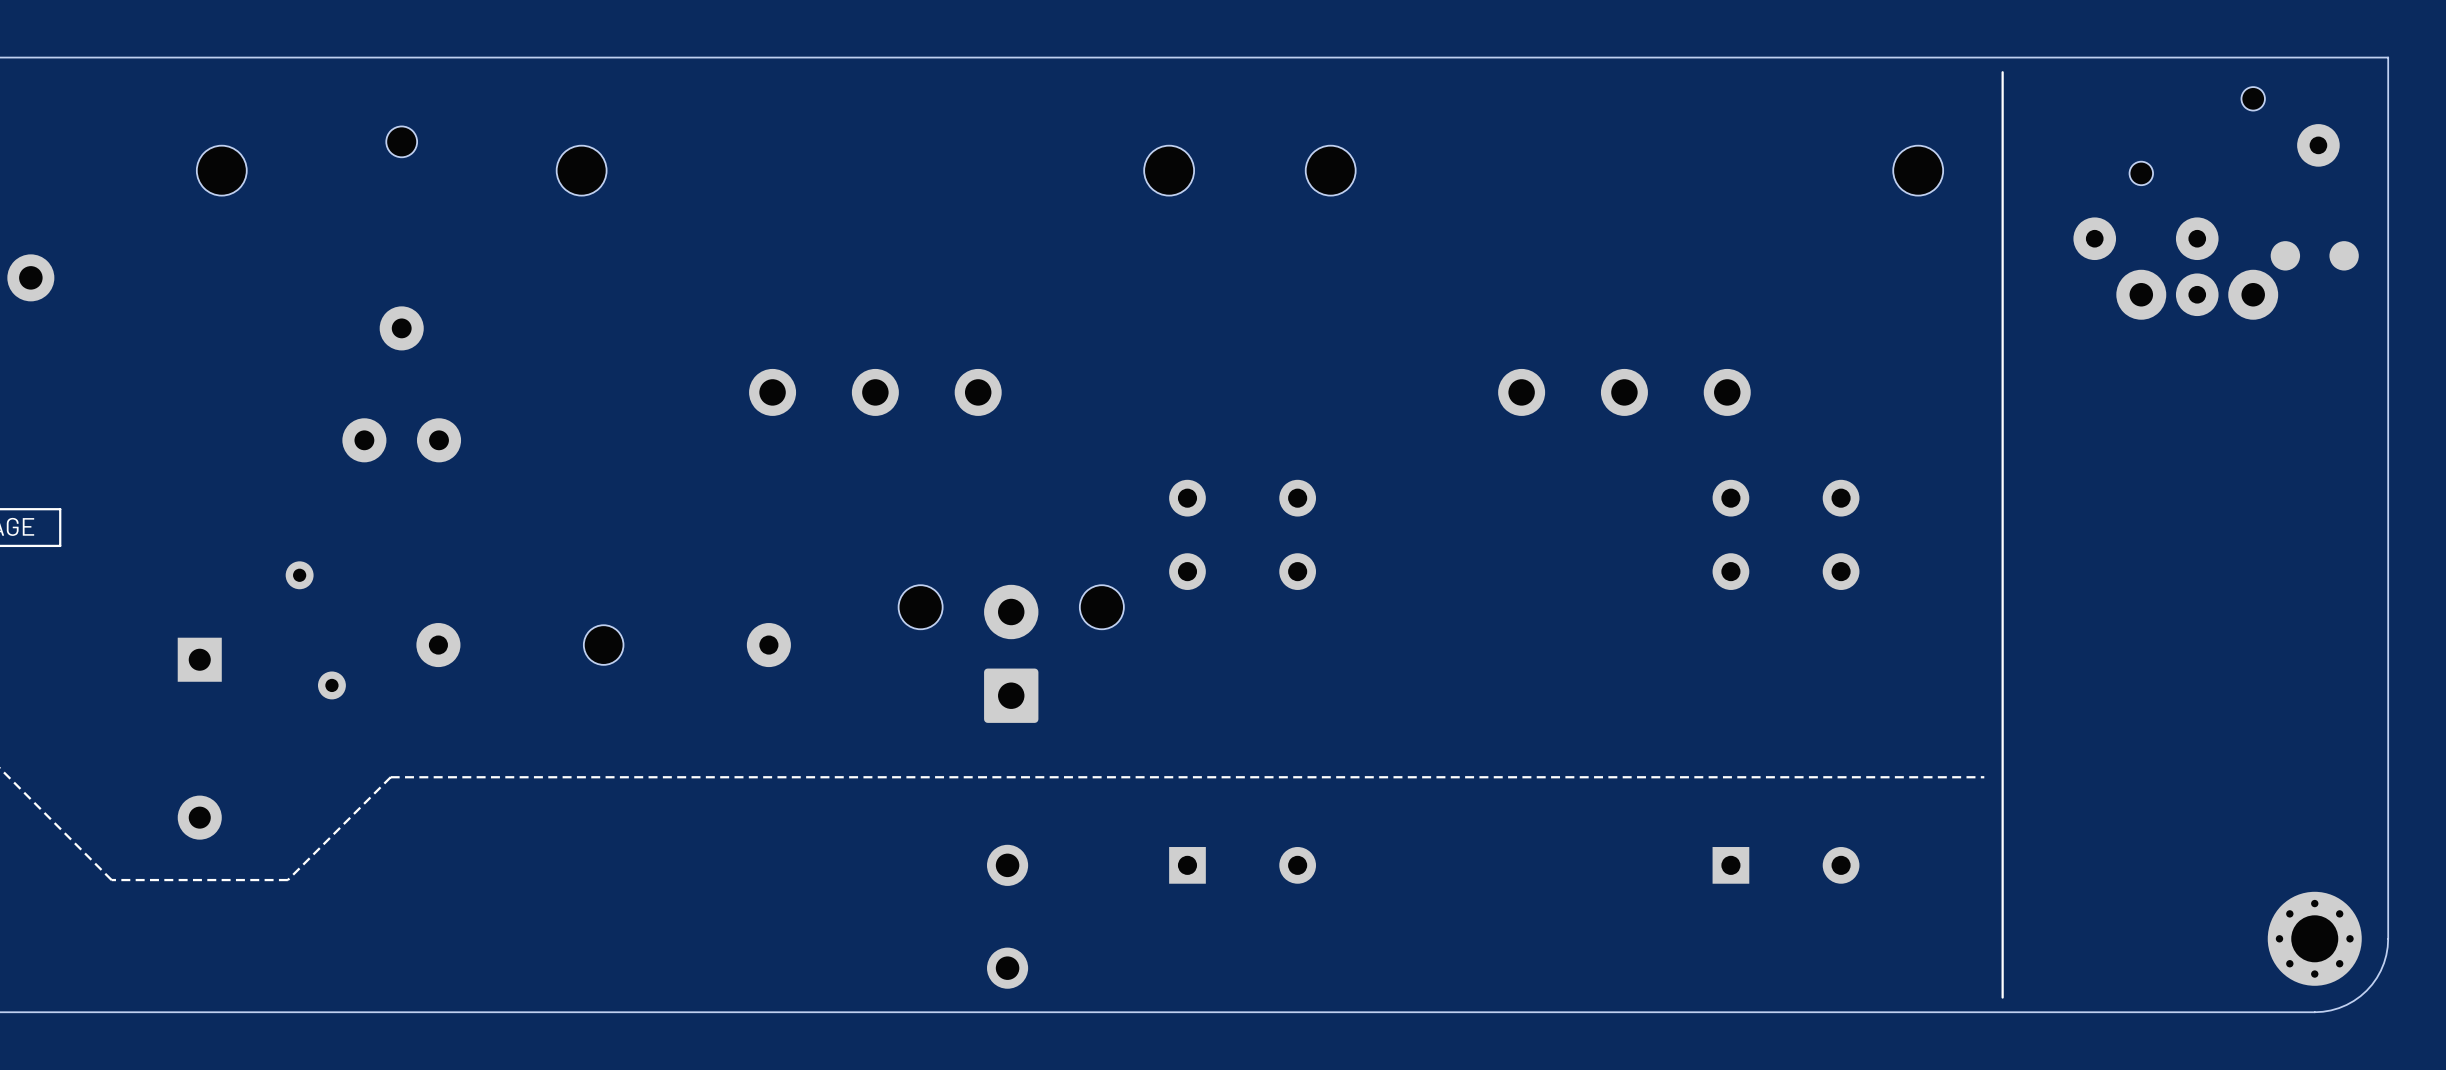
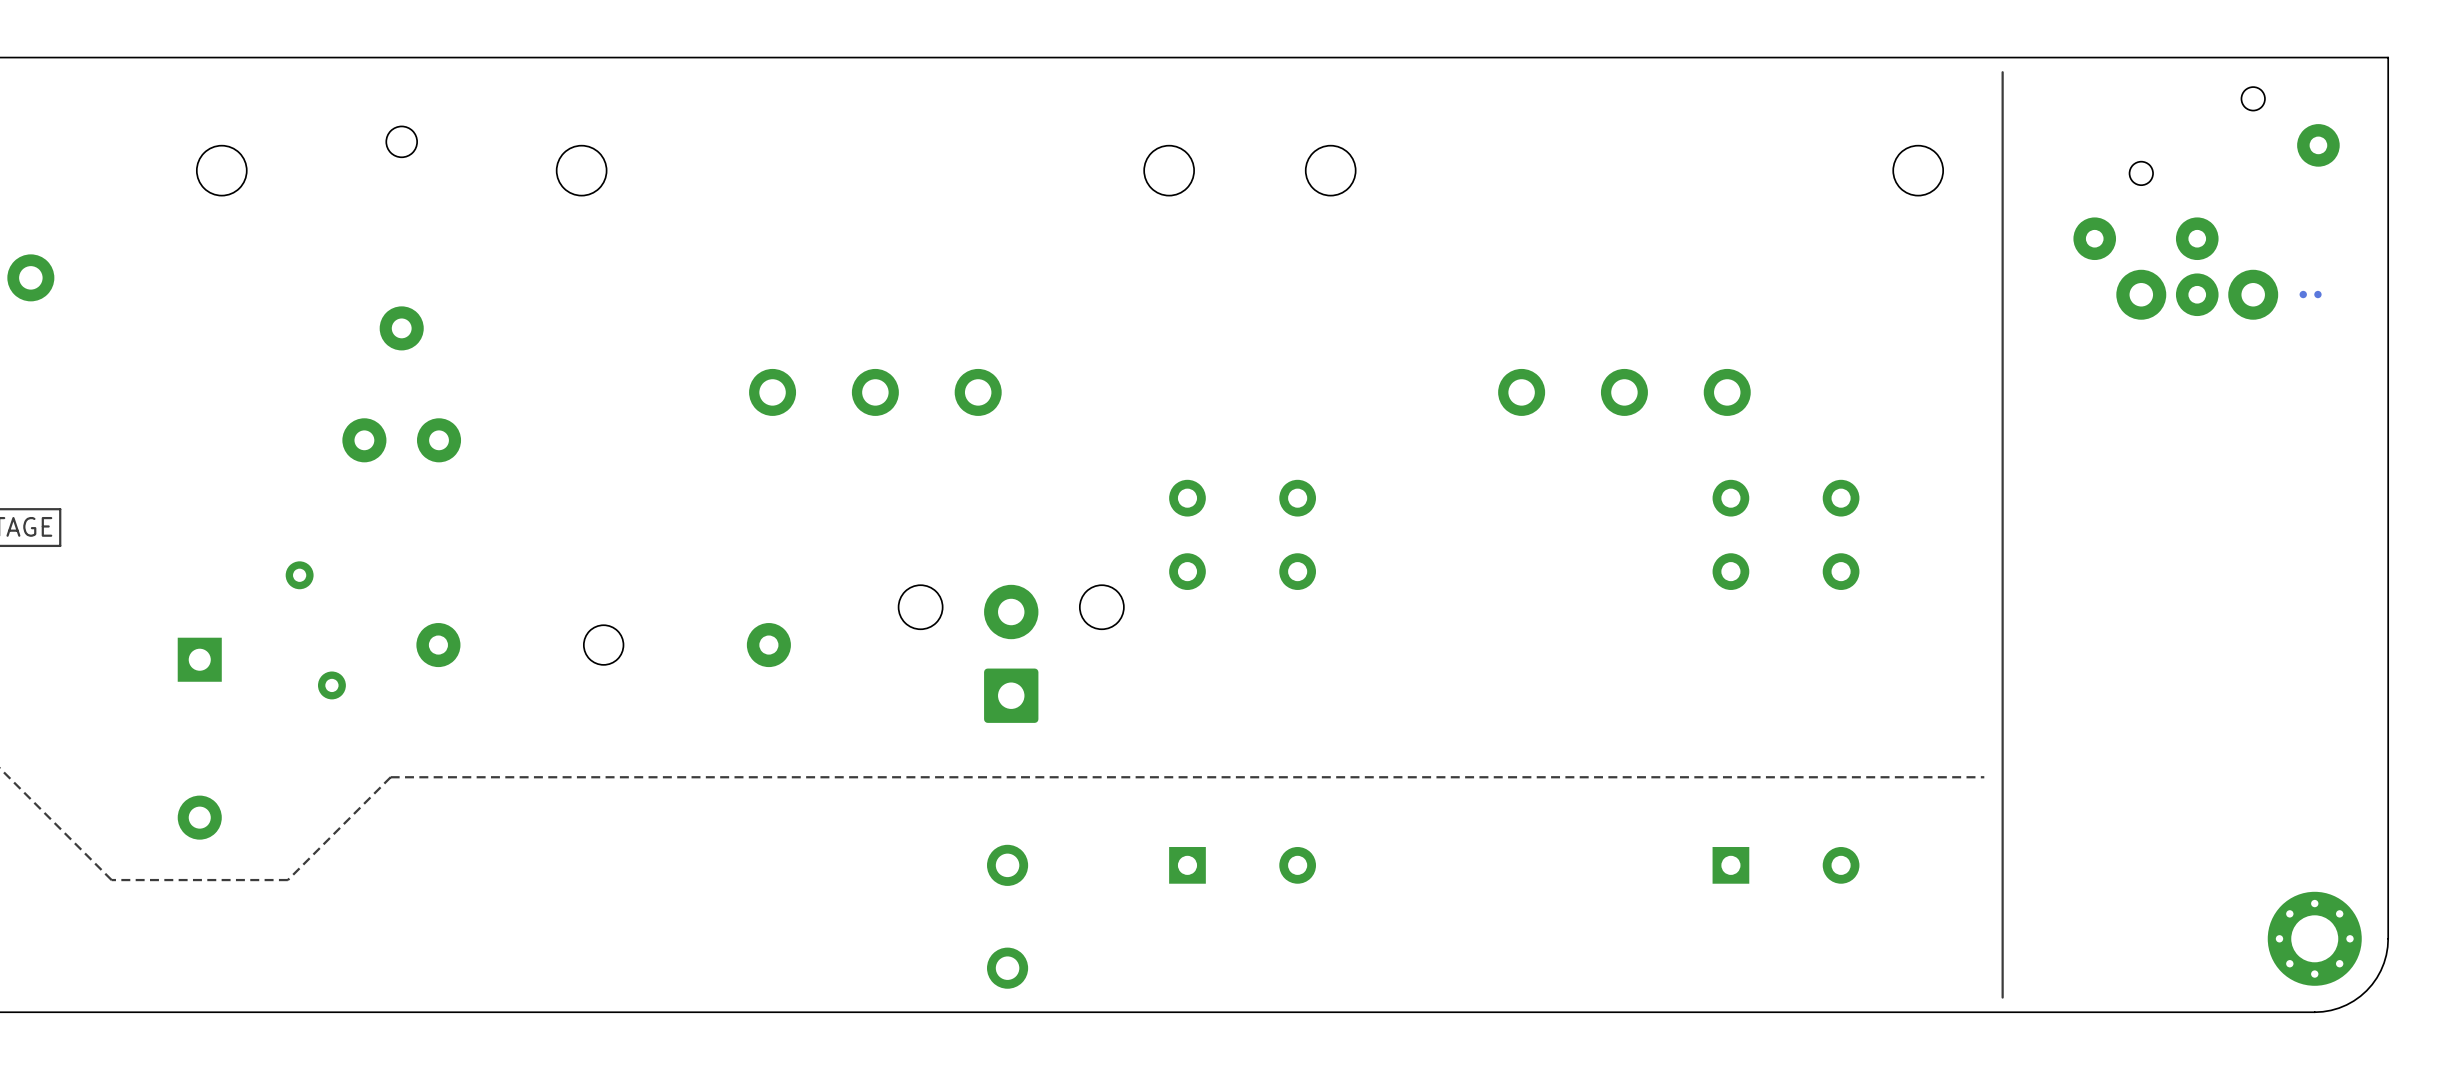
part: (2314, 255) -> none
part: none -> (2310, 294)

